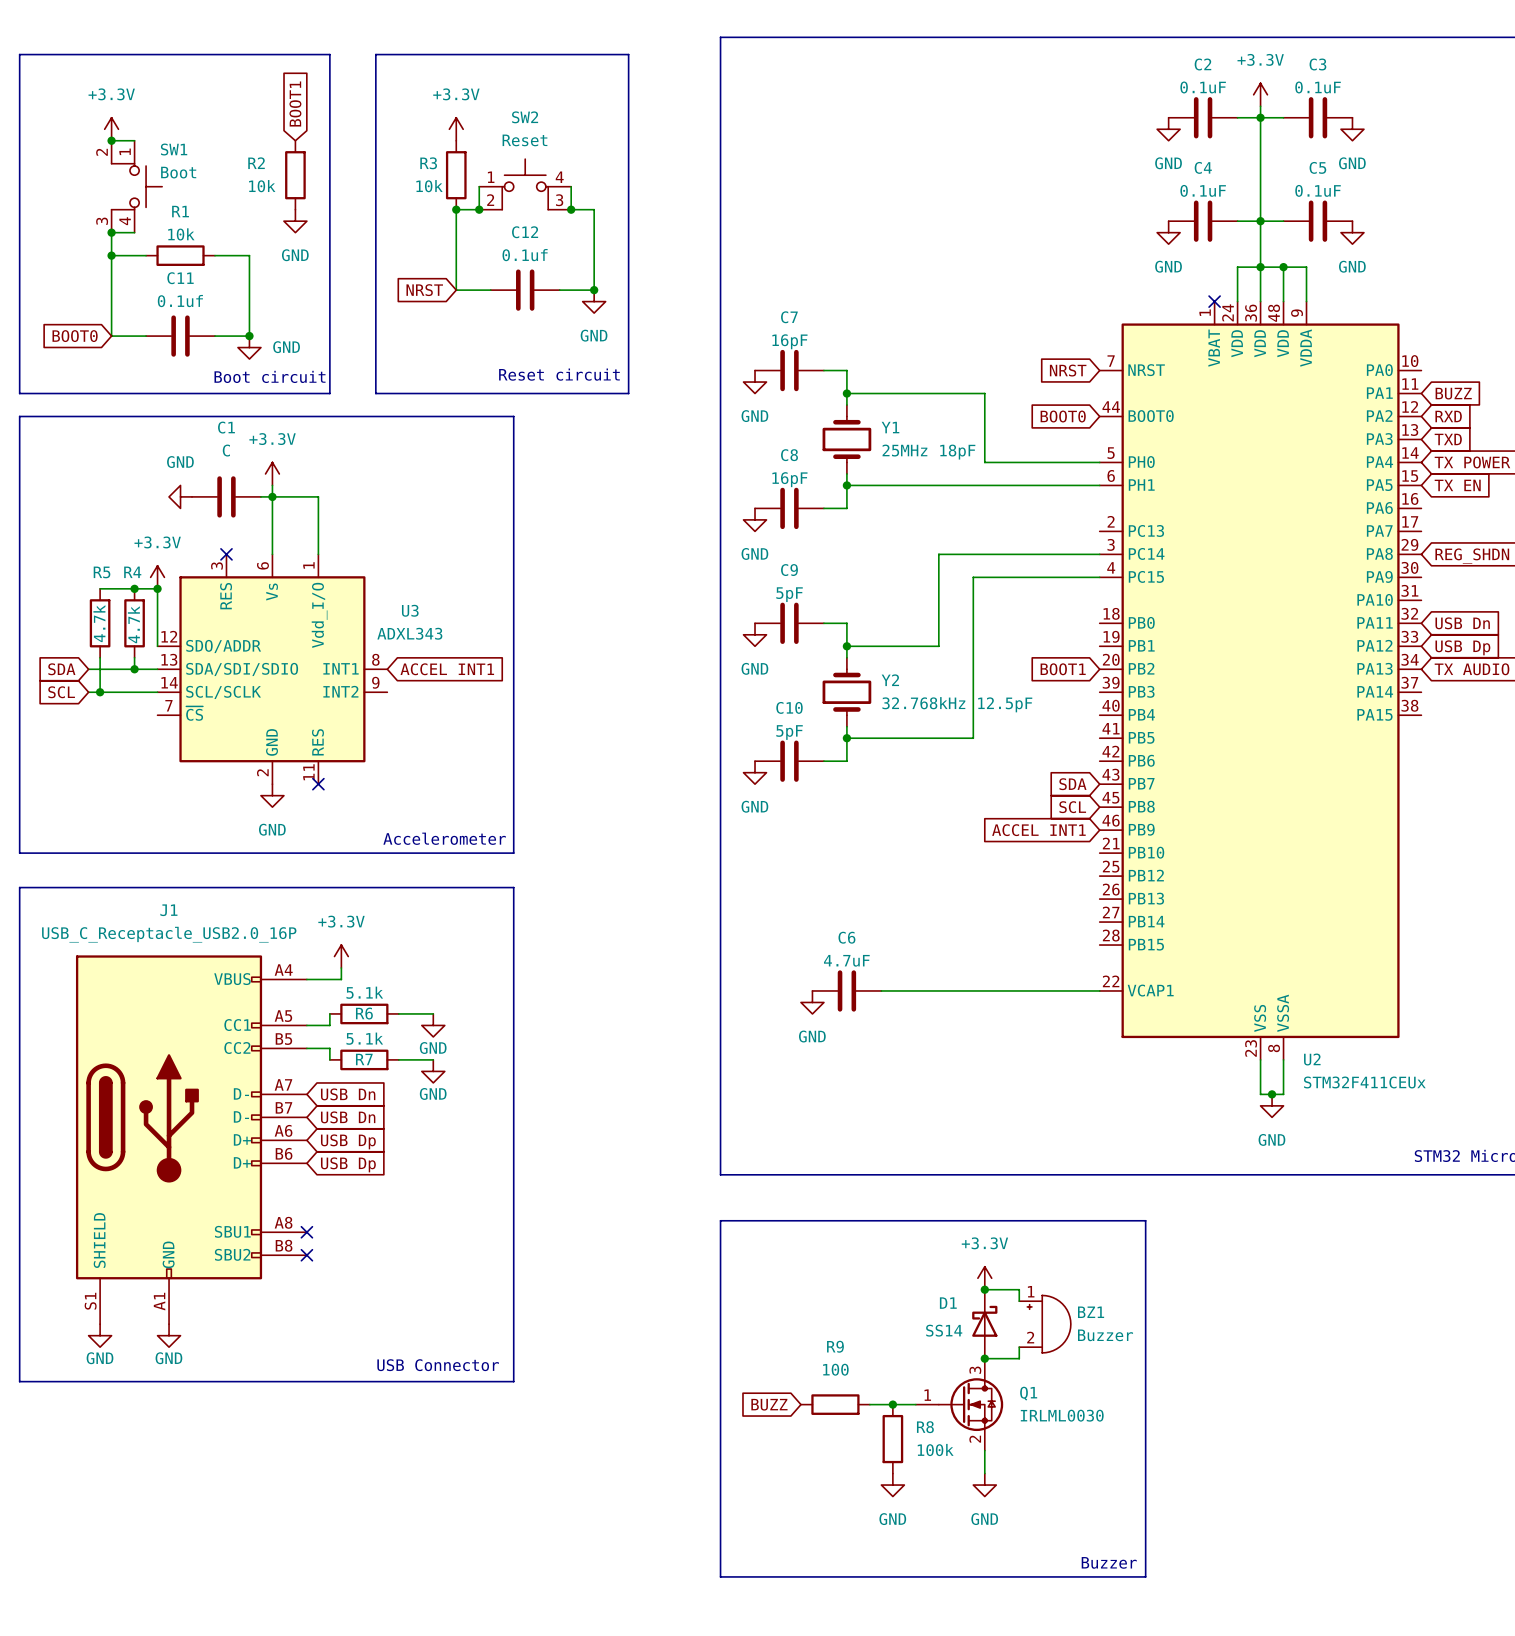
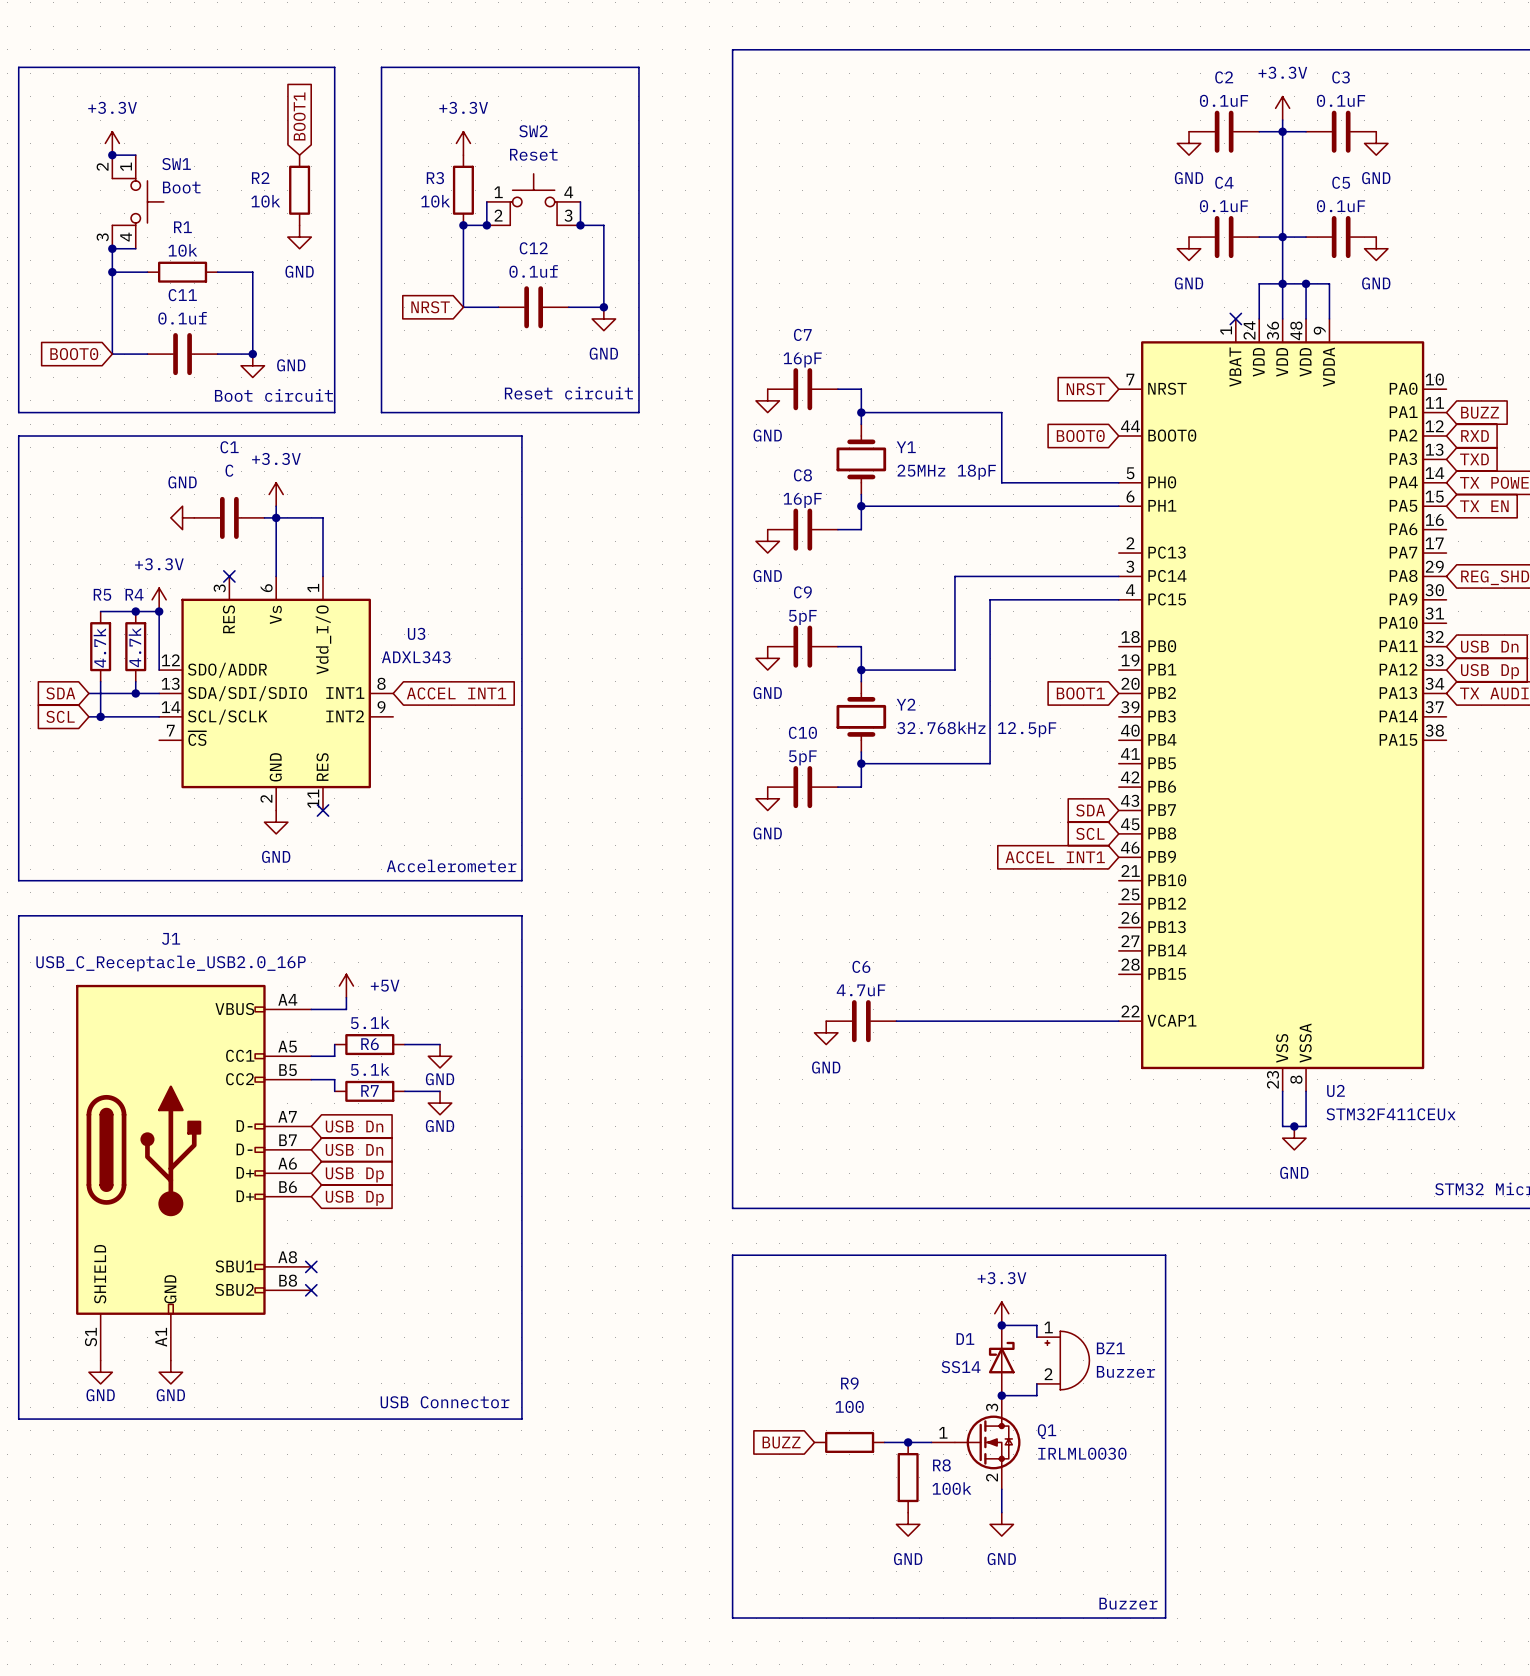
power symbol: +3.3V (341, 956) -> +5V (346, 986)

